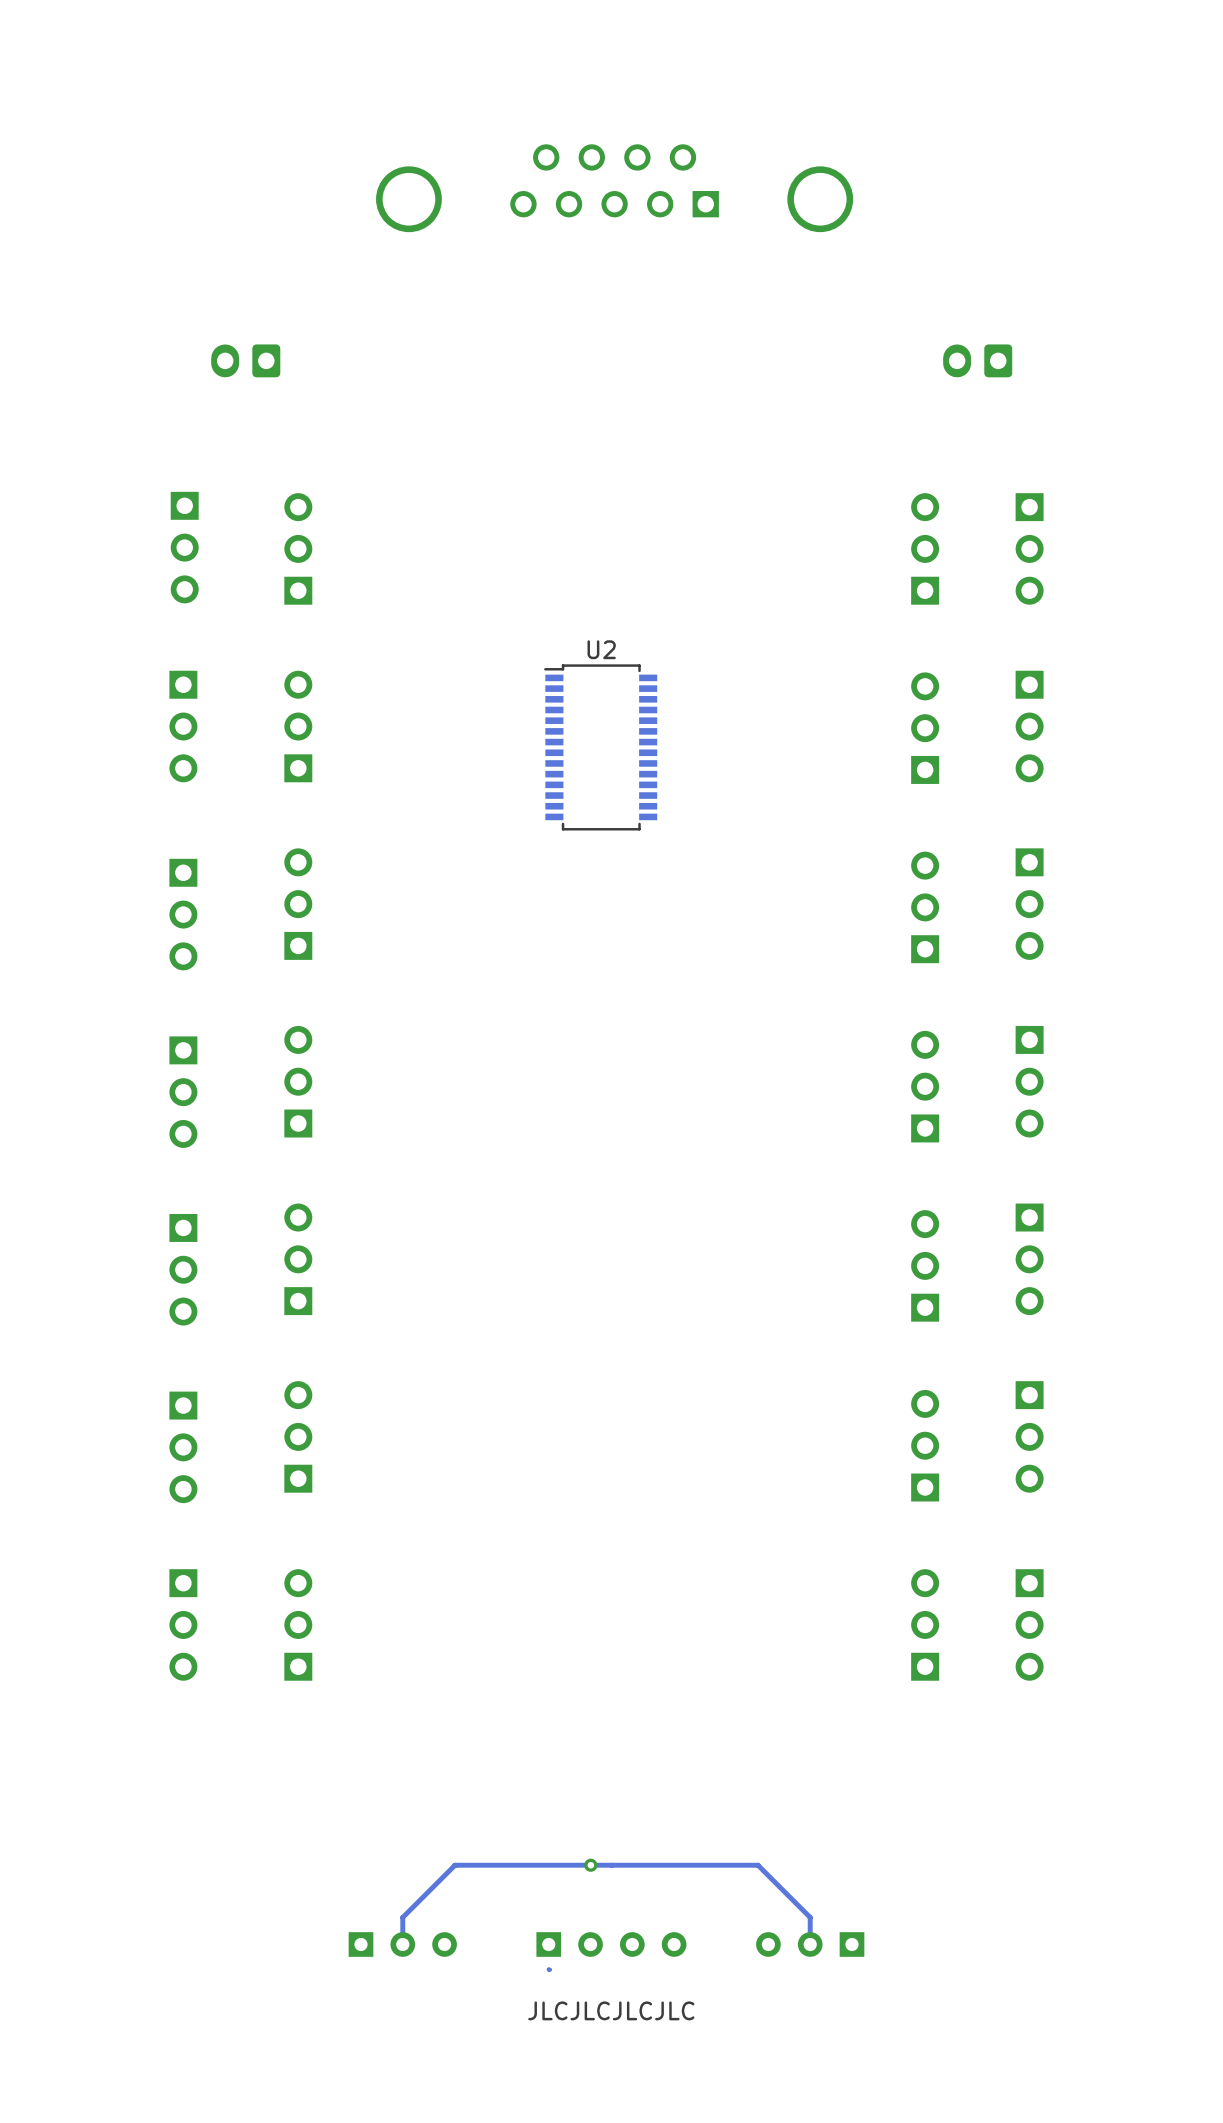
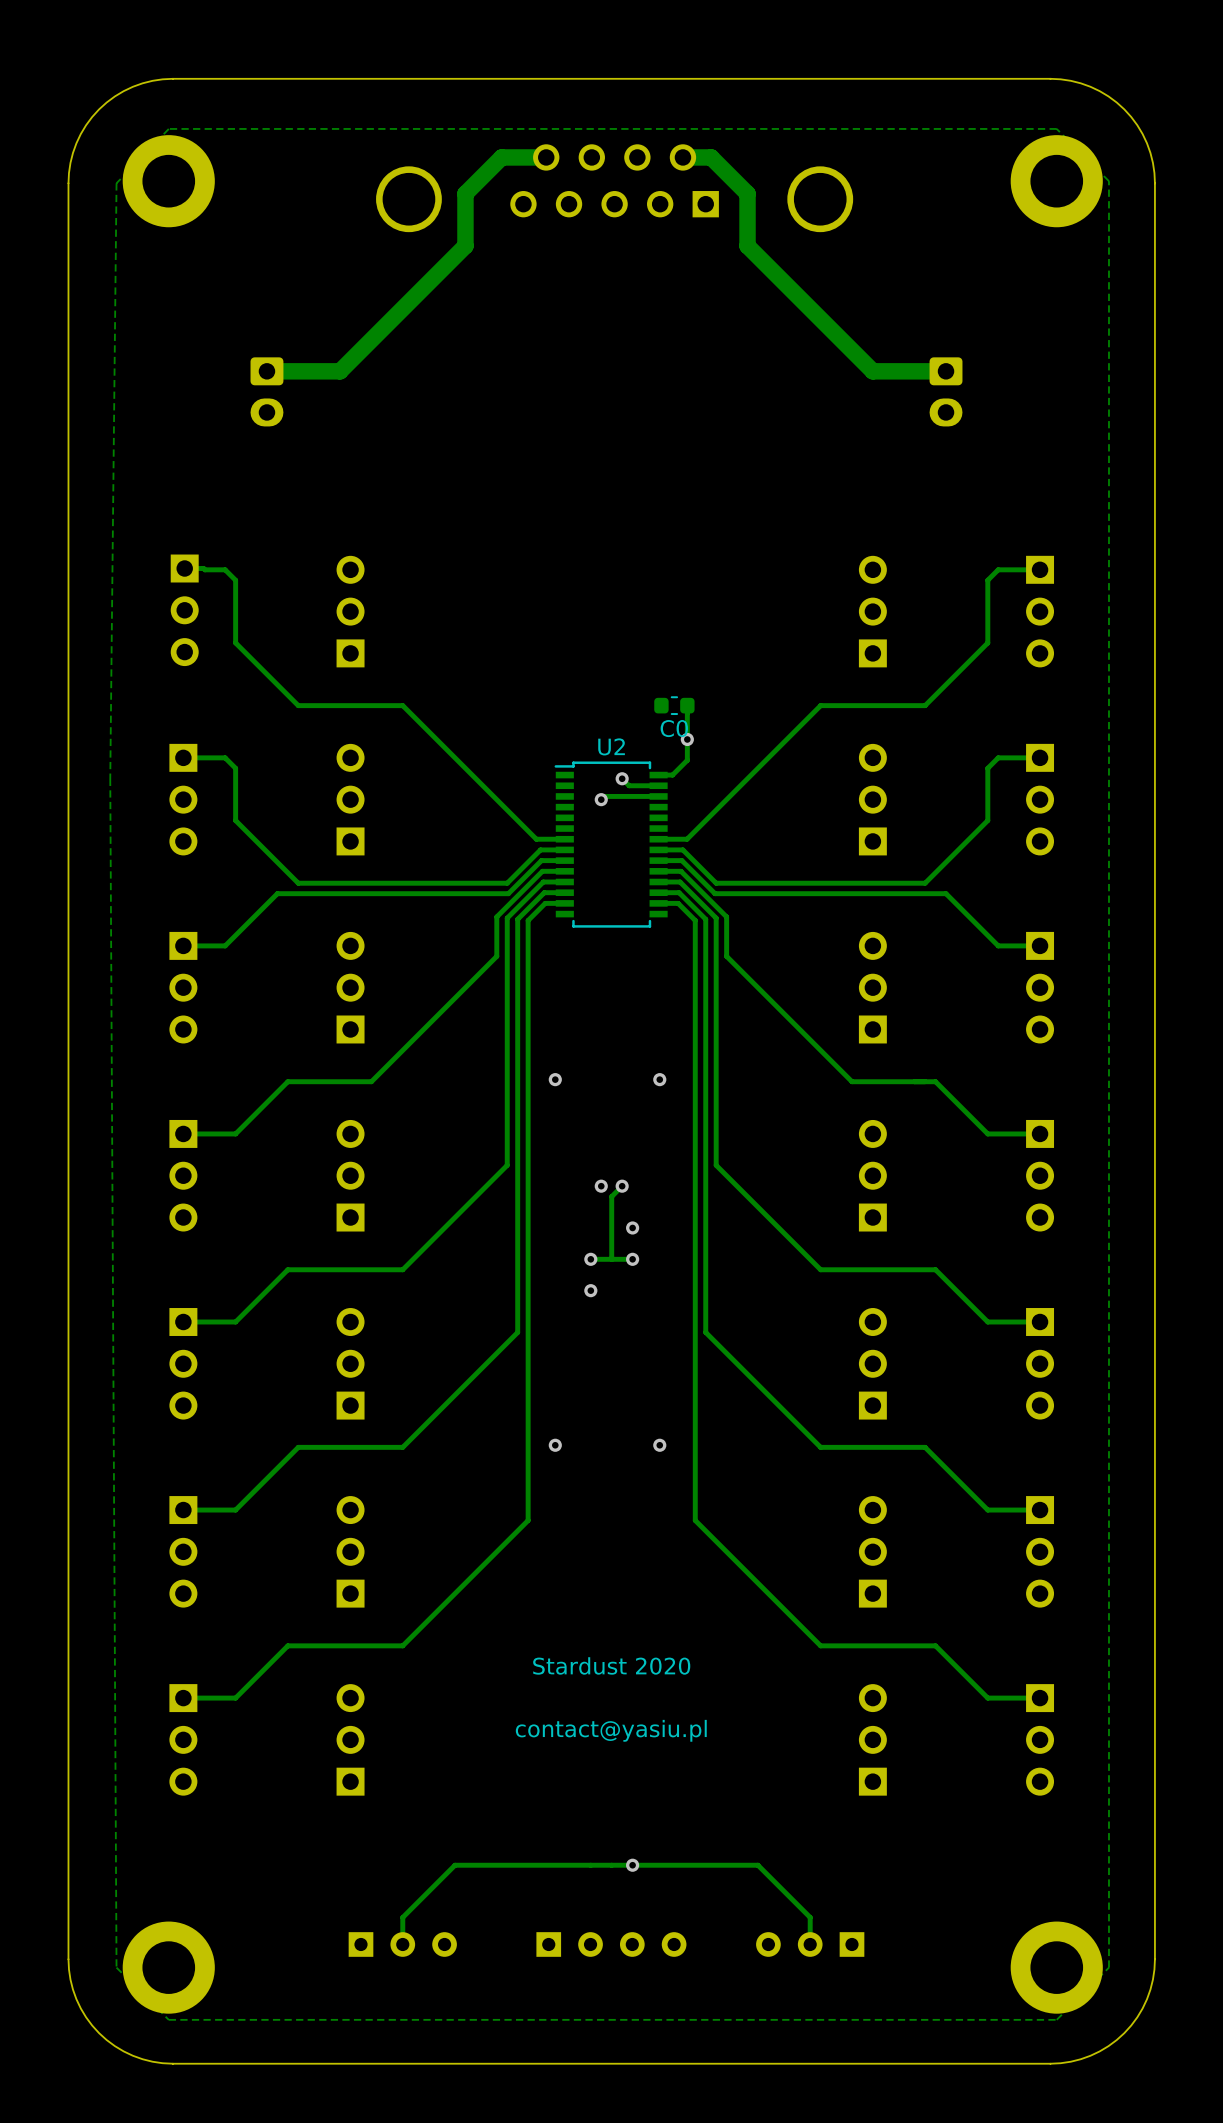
board edge: none -> (1050, 78) (162, 79) (142, 83) (114, 96) (92, 117) (76, 143) (70, 162) (68, 183) (68, 1959) (72, 1989) (86, 2017) (106, 2040) (132, 2055) (152, 2061) (172, 2063) (1060, 2063) (1090, 2055) (1116, 2040) (1131, 2025) (1147, 1999) (1152, 1979) (1154, 1959) (1154, 173) (1150, 152) (1142, 134) (1131, 117) (1116, 102) (1099, 91) (1080, 83) (1050, 78)
zone outline: none -> (1056, 128) (1108, 181) (1108, 1967) (1056, 2019) (168, 2019) (116, 1967) (110, 778) (116, 183) (168, 128) (1056, 128)
track: none -> (543, 157) (501, 157) (465, 193) (465, 245) (340, 371) (266, 371)
track: none -> (680, 157) (711, 157) (747, 193) (747, 245) (872, 371) (946, 371)
part: none -> (168, 181)
part: none -> (1056, 181)
part rotation: 0° (245, 360) -> 90° counterclockwise (266, 391)
part rotation: 0° (977, 360) -> 90° counterclockwise (946, 391)
part position: (977, 360) -> (946, 391)
part: (184, 547) -> none
part: (298, 548) -> none
part: (925, 548) -> none
part: (1029, 548) -> none
track: none -> (184, 568) (225, 569) (235, 580) (235, 642) (298, 705) (402, 705) (536, 839) (564, 839)
track: none -> (1040, 569) (998, 569) (987, 580) (987, 642) (925, 705) (820, 705) (687, 839) (658, 839)
part: none -> (184, 610)
part: none -> (350, 611)
part: none -> (872, 611)
part: none -> (1040, 611)
C0: none -> (674, 705)
track: none -> (687, 705) (687, 760) (672, 775) (658, 775)
part: (183, 726) -> none
part: (298, 726) -> none
part: (1029, 726) -> none
part: (925, 728) -> none
via: none -> (687, 739)
U2 position: (600, 747) -> (611, 844)
track: none -> (183, 757) (225, 757) (235, 768) (235, 820) (298, 883) (507, 883) (540, 849) (564, 849)
track: none -> (1040, 757) (998, 757) (987, 768) (987, 820) (925, 883) (716, 883) (682, 849) (658, 849)
track: none -> (622, 778) (629, 785) (658, 785)
via: none -> (622, 778)
track: none -> (658, 796) (604, 796) (601, 799)
part: none -> (183, 799)
part: none -> (350, 799)
via: none -> (601, 799)
part: none -> (872, 799)
part: none -> (1040, 799)
track: none -> (564, 860) (541, 860) (508, 893) (277, 893) (225, 945) (183, 945)
track: none -> (658, 860) (681, 860) (715, 893) (946, 893) (998, 945) (1040, 945)
track: none -> (564, 871) (542, 871) (496, 916) (496, 956) (371, 1081) (287, 1081) (235, 1133) (183, 1133)
track: none -> (658, 871) (681, 871) (726, 916) (726, 956) (851, 1081) (935, 1081) (987, 1133) (1040, 1133)
track: none -> (564, 882) (543, 882) (507, 918) (507, 1165) (402, 1269) (287, 1269) (235, 1322) (183, 1322)
track: none -> (658, 882) (680, 882) (716, 918) (716, 1165) (820, 1269) (935, 1269) (987, 1322) (1040, 1322)
track: none -> (564, 892) (544, 892) (517, 919) (517, 1332) (402, 1447) (298, 1447) (235, 1510) (183, 1510)
track: none -> (658, 892) (679, 892) (705, 919) (705, 1332) (820, 1447) (925, 1447) (987, 1510) (1040, 1510)
track: none -> (564, 903) (545, 903) (528, 920) (528, 1520) (402, 1645) (287, 1645) (235, 1698) (183, 1698)
track: none -> (658, 903) (678, 903) (695, 920) (695, 1520) (820, 1645) (935, 1645) (987, 1698) (1040, 1698)
part: (298, 904) -> none
part: (1029, 904) -> none
part: (925, 907) -> none
part: (183, 914) -> none
part: none -> (183, 987)
part: none -> (350, 987)
part: none -> (872, 987)
part: none -> (1040, 987)
via: none -> (555, 1079)
via: none -> (659, 1079)
part: (298, 1081) -> none
part: (1029, 1081) -> none
part: (925, 1086) -> none
part: (183, 1092) -> none
part: none -> (183, 1175)
part: none -> (350, 1175)
part: none -> (872, 1175)
part: none -> (1040, 1175)
via: none -> (601, 1186)
track: none -> (622, 1186) (611, 1196) (611, 1259)
via: none -> (622, 1186)
via: none -> (632, 1227)
part: (298, 1259) -> none
via: none -> (590, 1259)
track: none -> (632, 1259) (590, 1259)
via: none -> (632, 1259)
part: (1029, 1259) -> none
part: (925, 1265) -> none
part: (183, 1269) -> none
via: none -> (590, 1290)
part: none -> (183, 1363)
part: none -> (350, 1363)
part: none -> (872, 1363)
part: none -> (1040, 1363)
part: (298, 1436) -> none
part: (1029, 1436) -> none
via: none -> (555, 1445)
via: none -> (659, 1445)
part: (925, 1445) -> none
part: (183, 1447) -> none
part: none -> (183, 1551)
part: none -> (350, 1551)
part: none -> (872, 1551)
part: none -> (1040, 1551)
part: (183, 1624) -> none
part: (298, 1624) -> none
part: (925, 1624) -> none
part: (1029, 1624) -> none
text: none -> Stardust 2020 (611, 1665)
text: none -> contact@yasiu.pl (611, 1730)
part: none -> (183, 1739)
part: none -> (350, 1739)
part: none -> (872, 1739)
part: none -> (1040, 1739)
via position: (590, 1865) -> (632, 1865)
part: none -> (168, 1967)
part: none -> (1056, 1967)
track: (548, 1969) (550, 1969) -> none
text: JLCJLCJLCJLC (611, 2010) -> none

